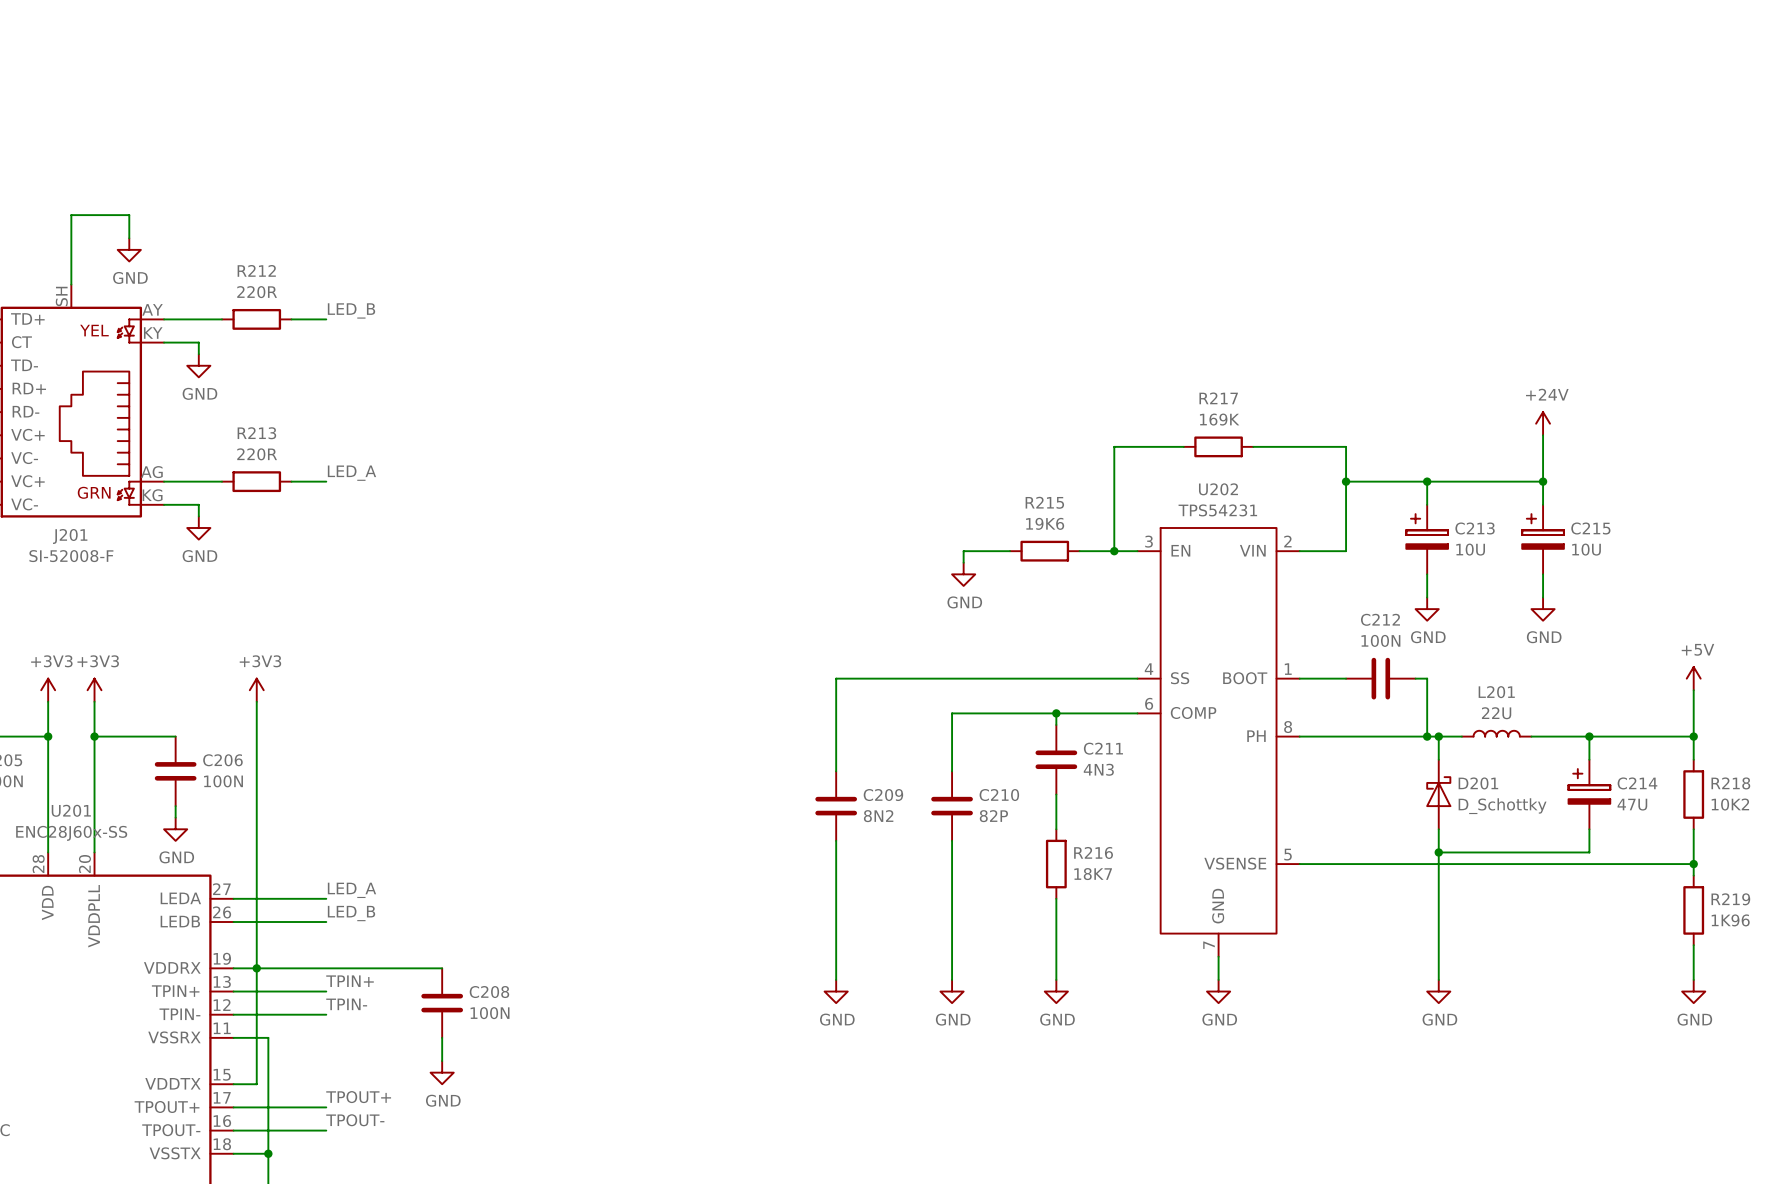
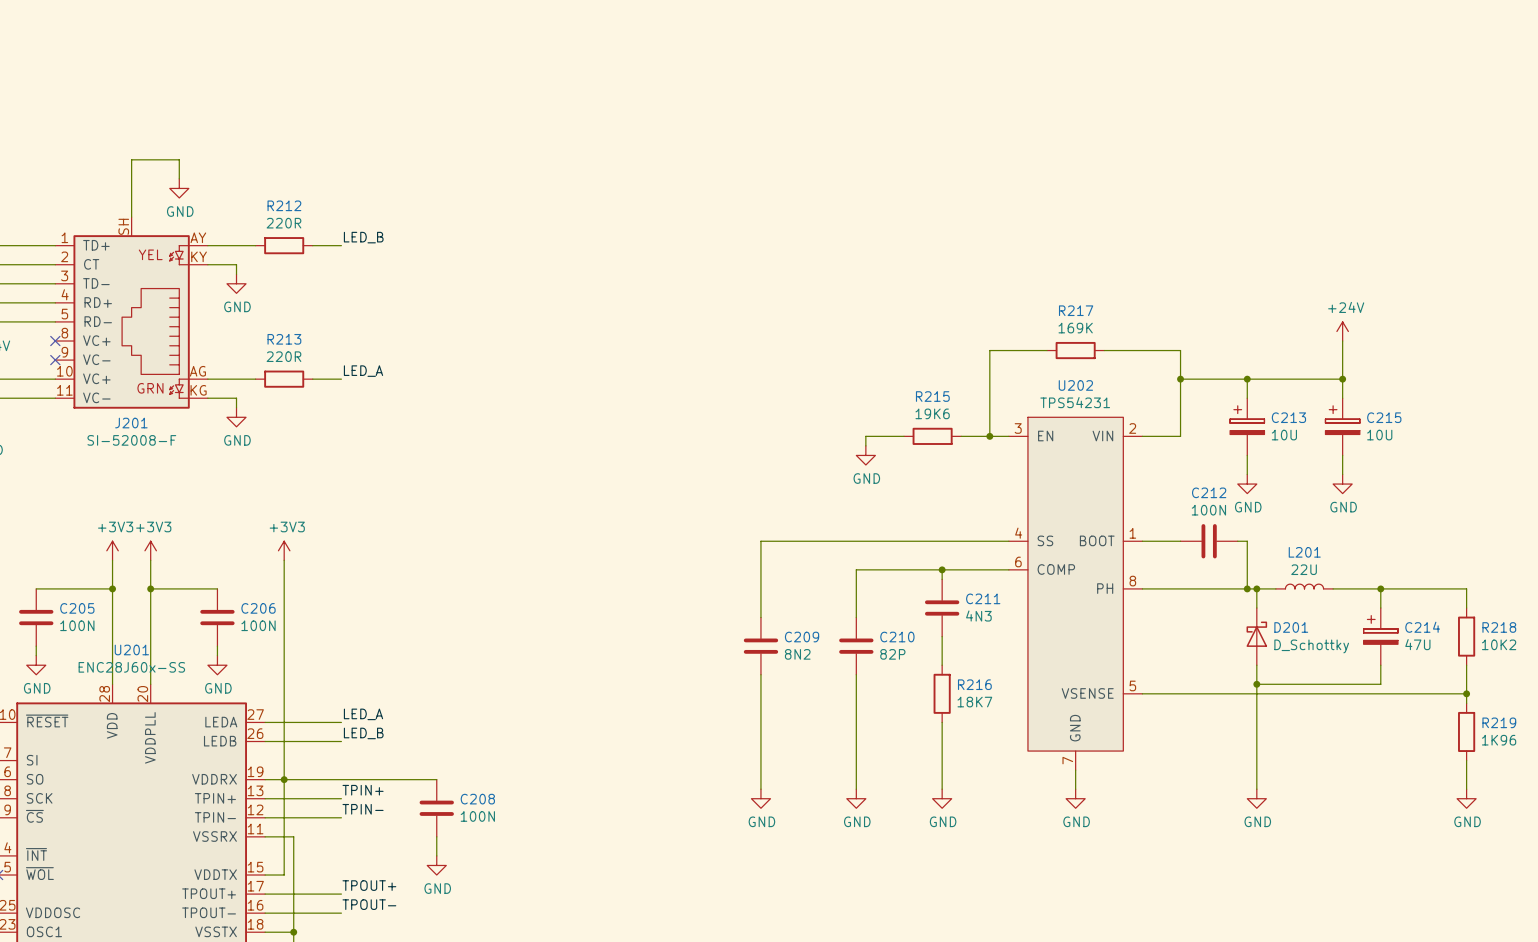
power symbol: +5V (1693, 678) -> none
wire: (1693, 690) (1693, 736) -> none
junction: (1693, 736) -> none

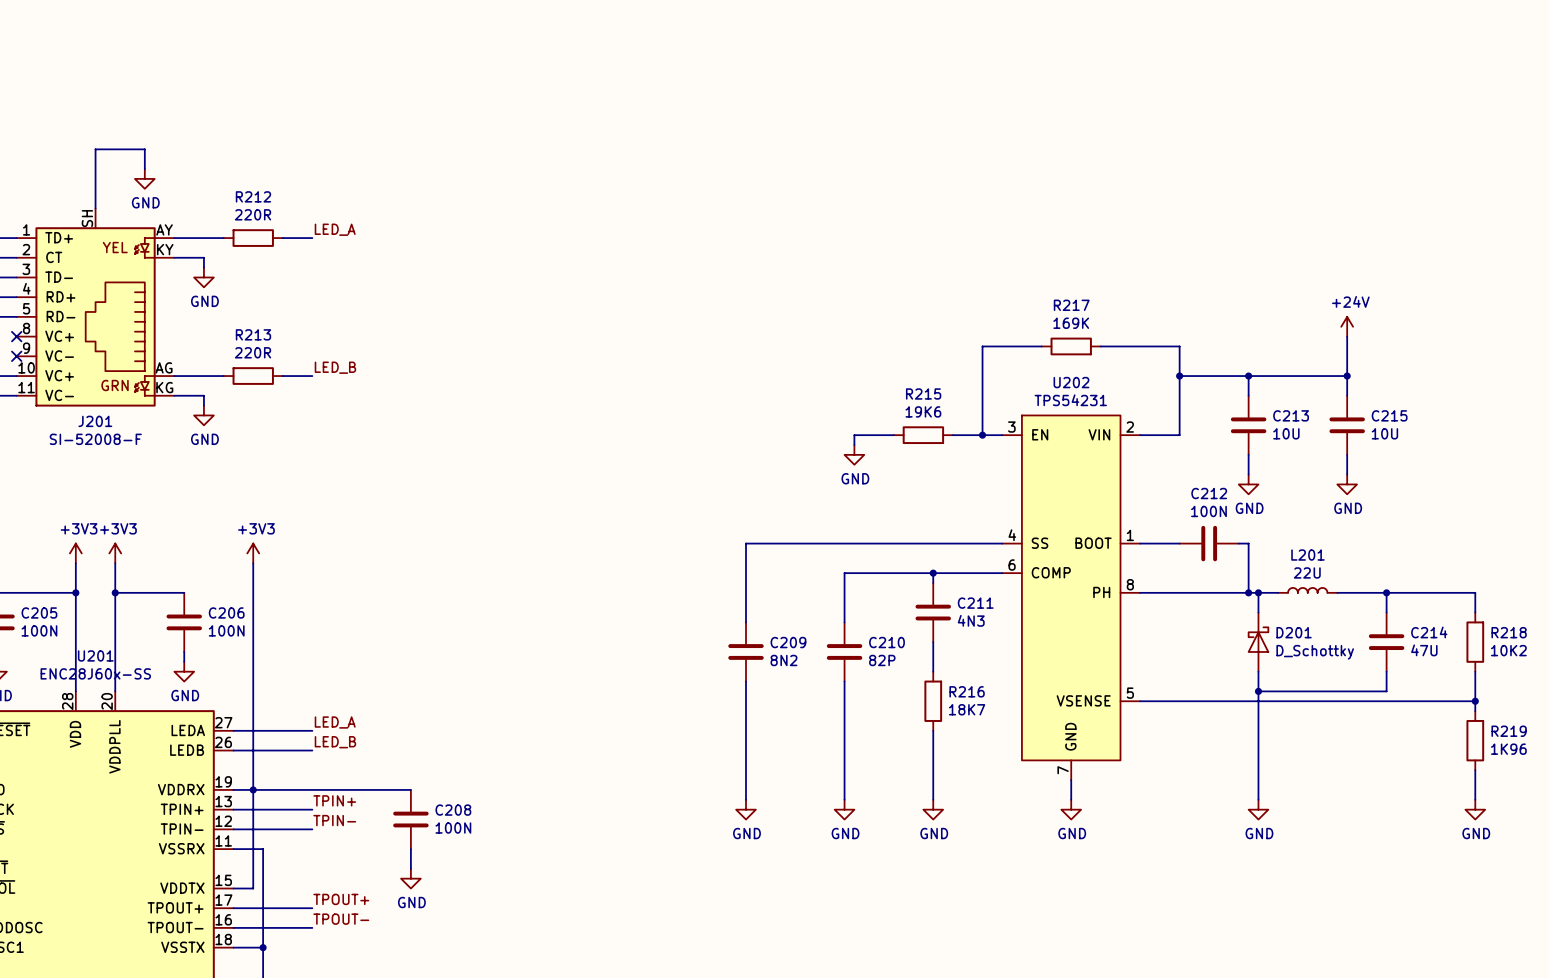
label: LED_B (363, 237) -> LED_A (335, 229)
label: LED_A (363, 371) -> LED_B (335, 367)
C213 symbol: [1230, 398, 1265, 456] -> [1230, 395, 1267, 455]
C215 symbol: [1325, 398, 1360, 456] -> [1329, 395, 1365, 455]
C214 symbol: [1363, 608, 1398, 666] -> [1368, 612, 1405, 672]

